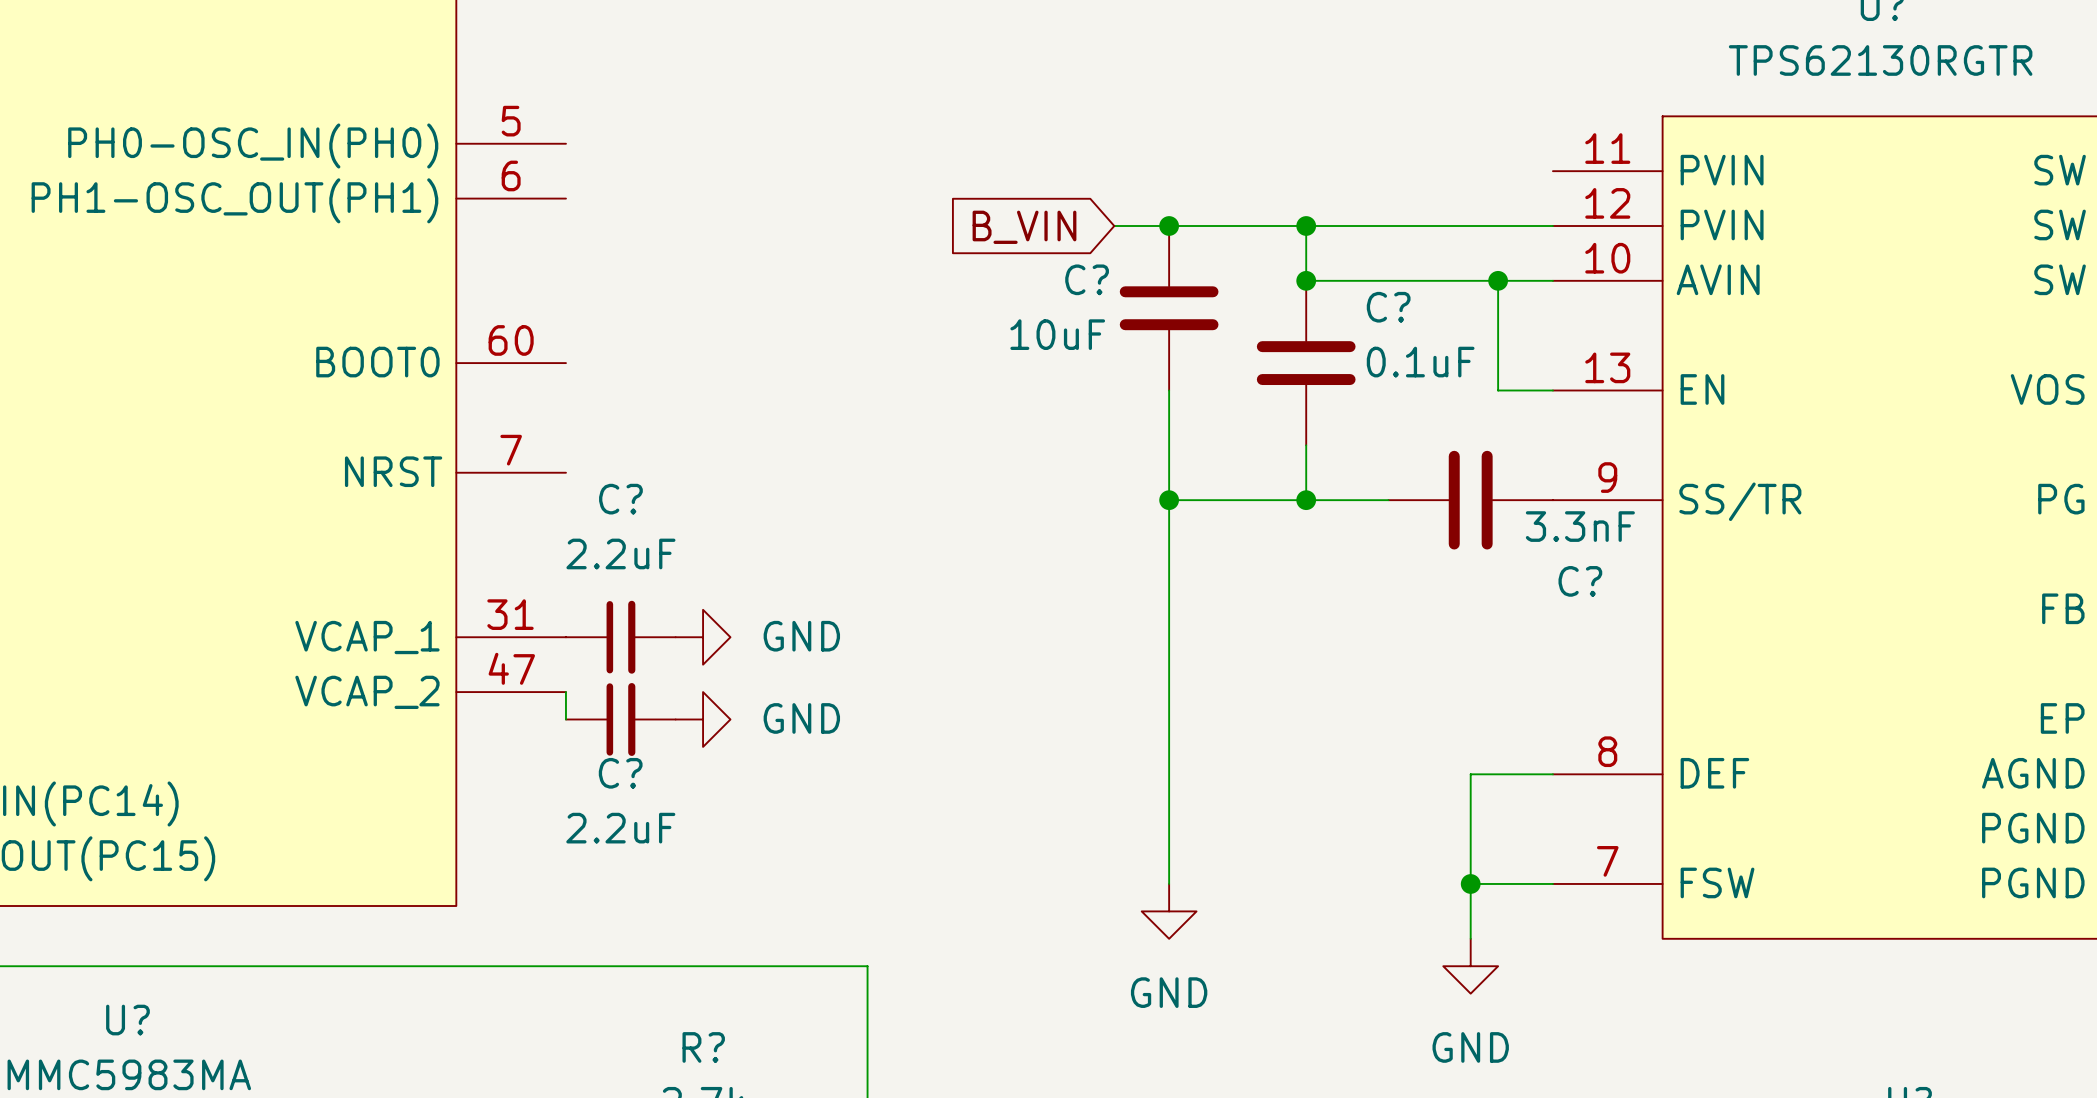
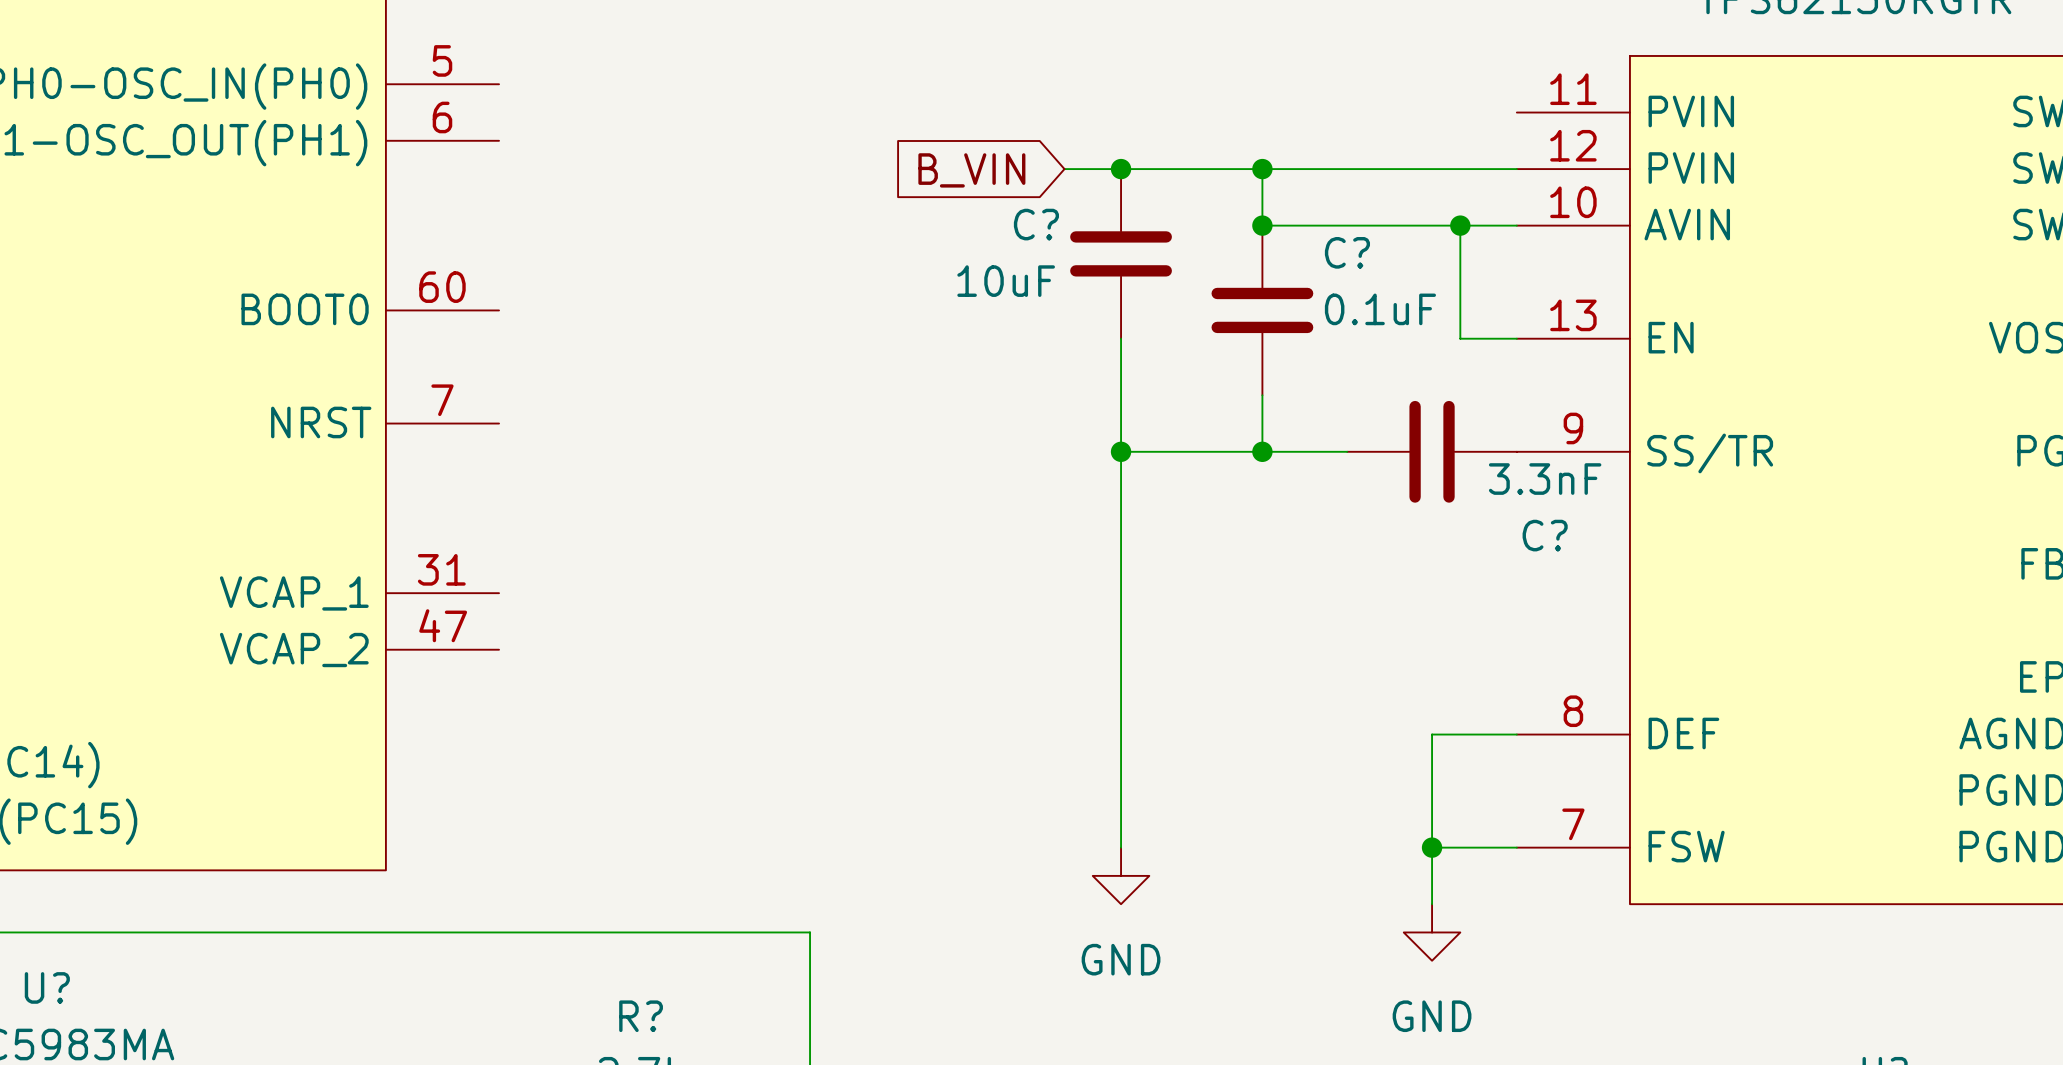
C?: 2.2uF (620, 637) -> none
power symbol: GND (703, 637) -> none
wire: (565, 692) (565, 719) -> none
C?: 2.2uF (620, 719) -> none
power symbol: GND (703, 719) -> none

